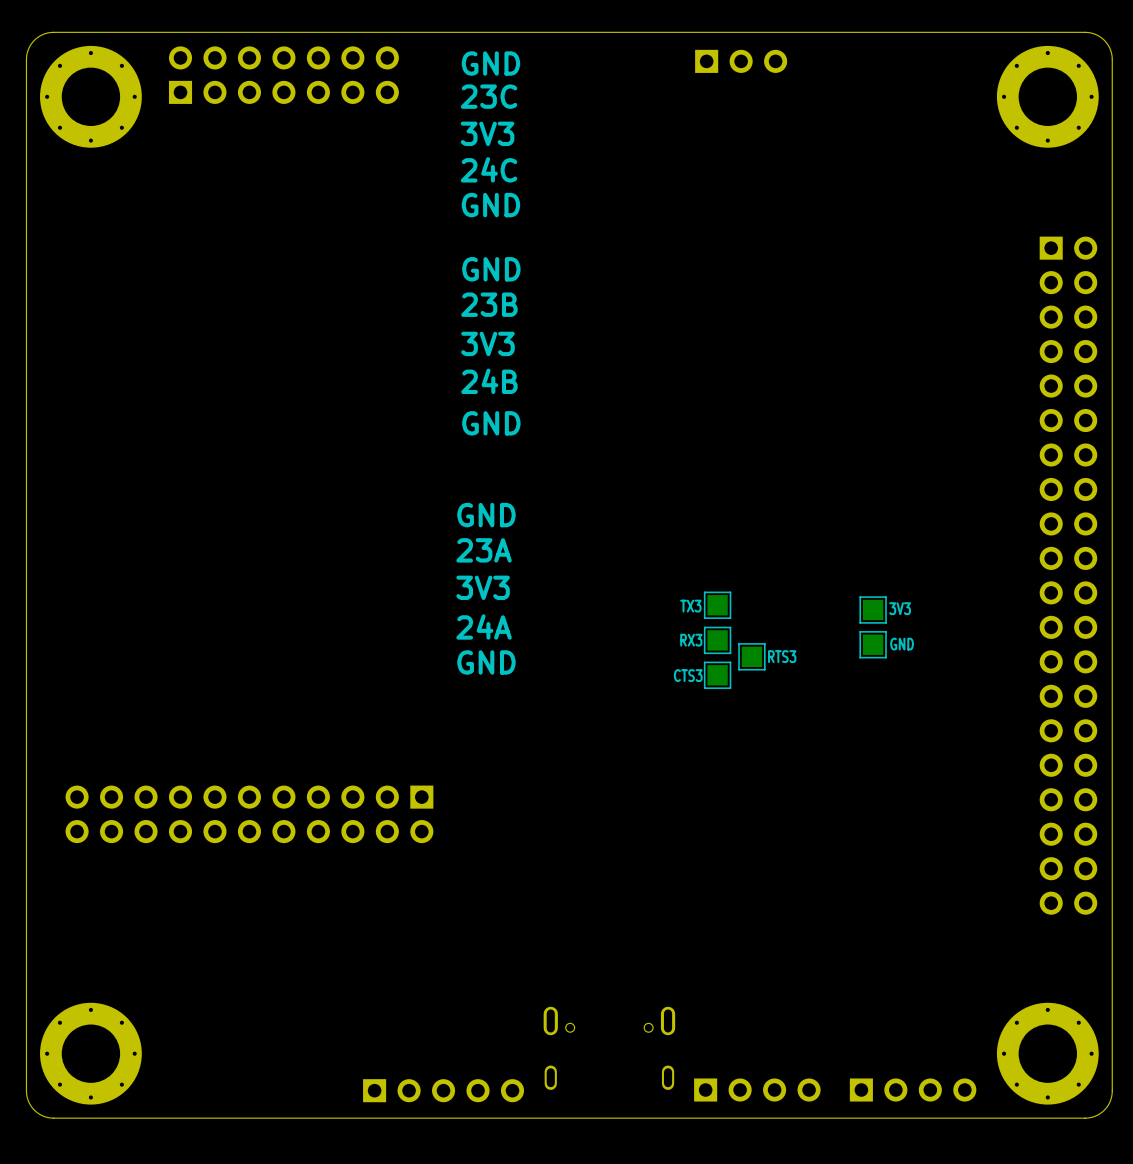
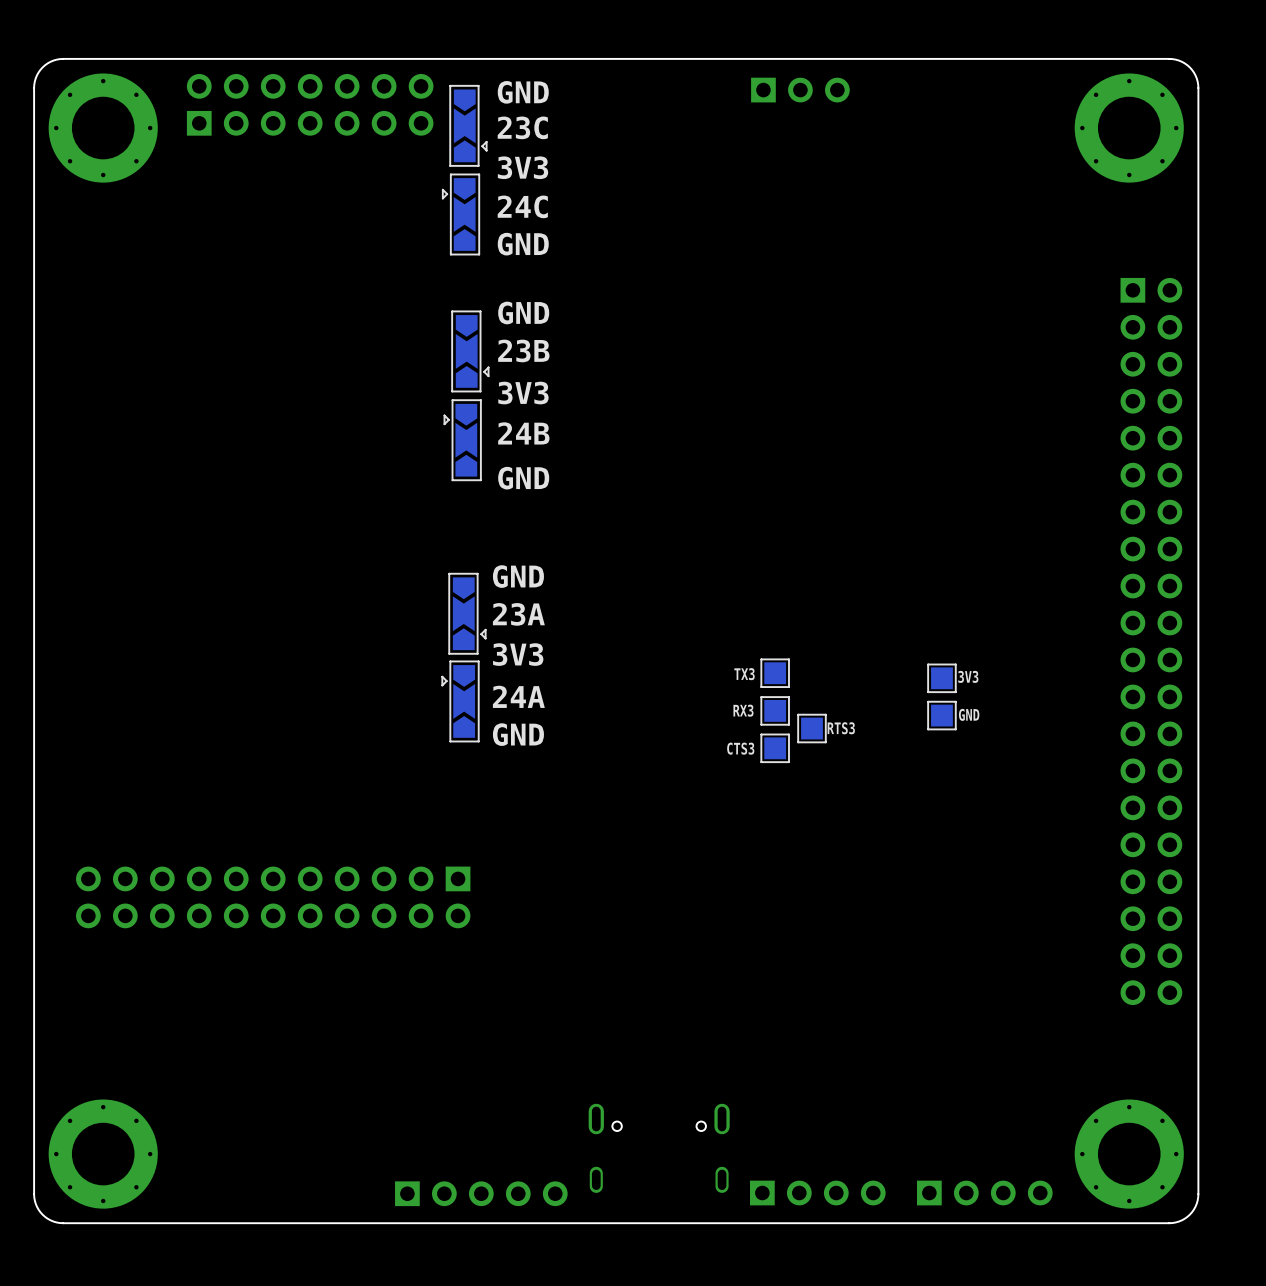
part: none -> (468, 125)
part: none -> (461, 214)
part: none -> (470, 351)
part: none -> (462, 440)
part: none -> (467, 613)
part: none -> (460, 701)

